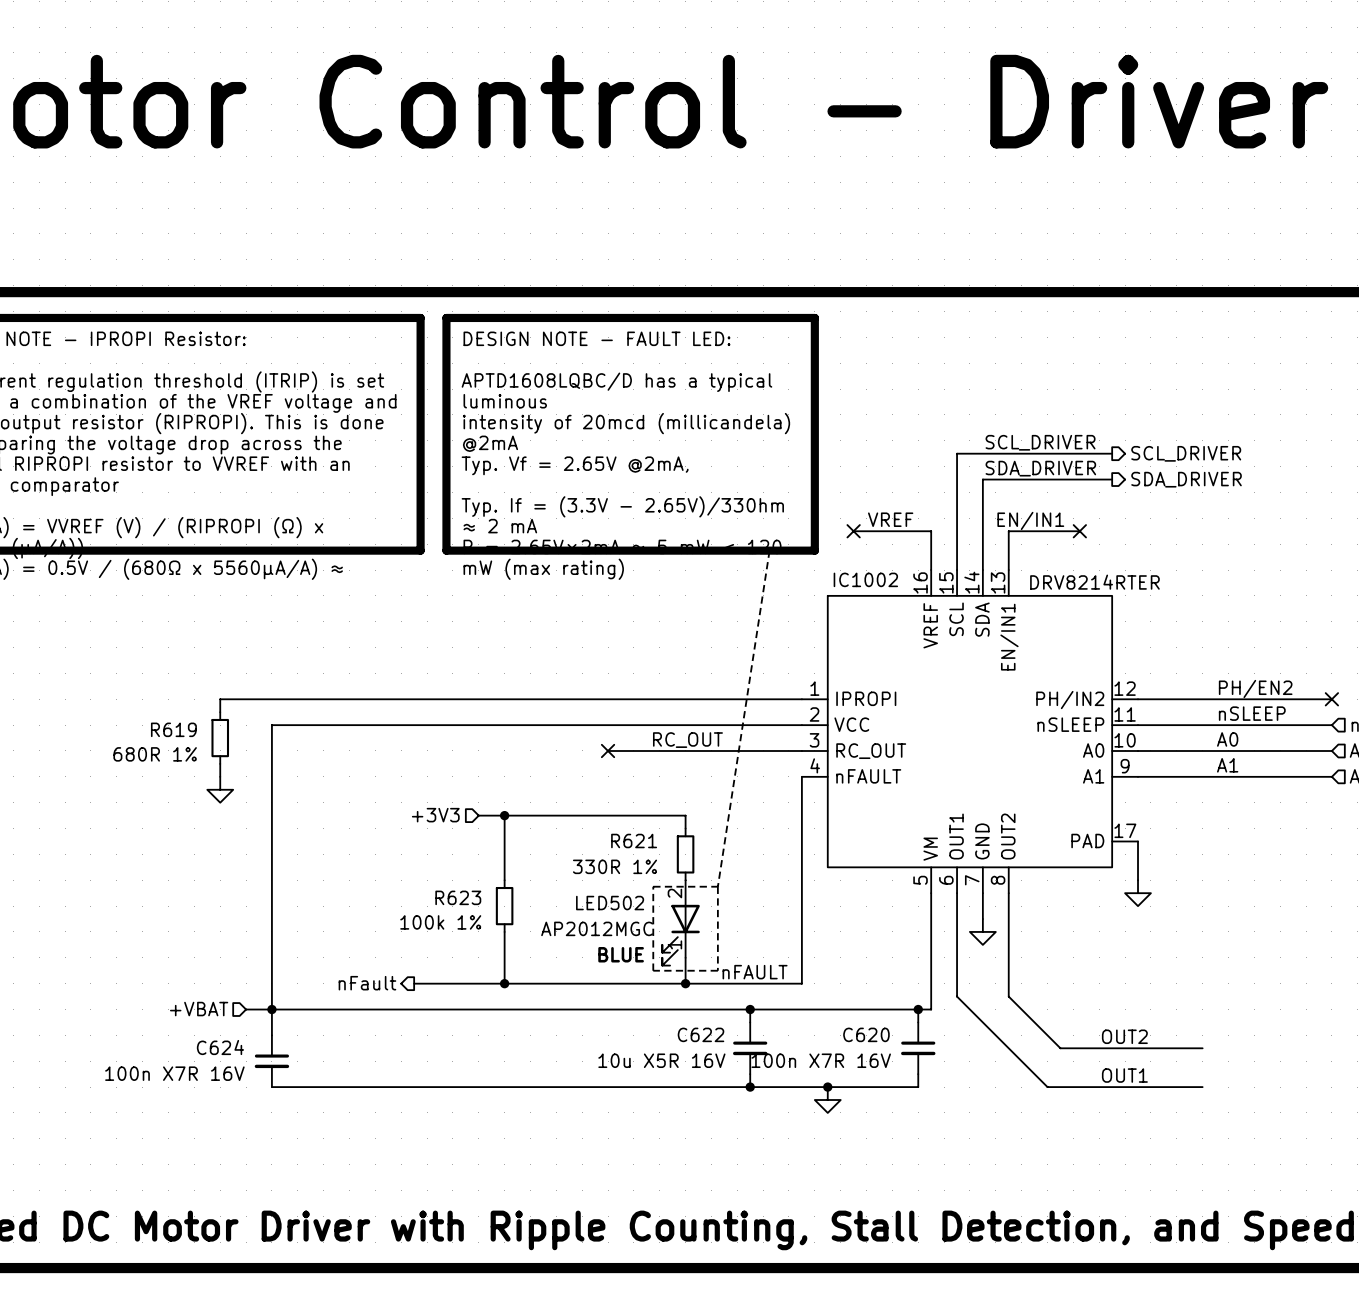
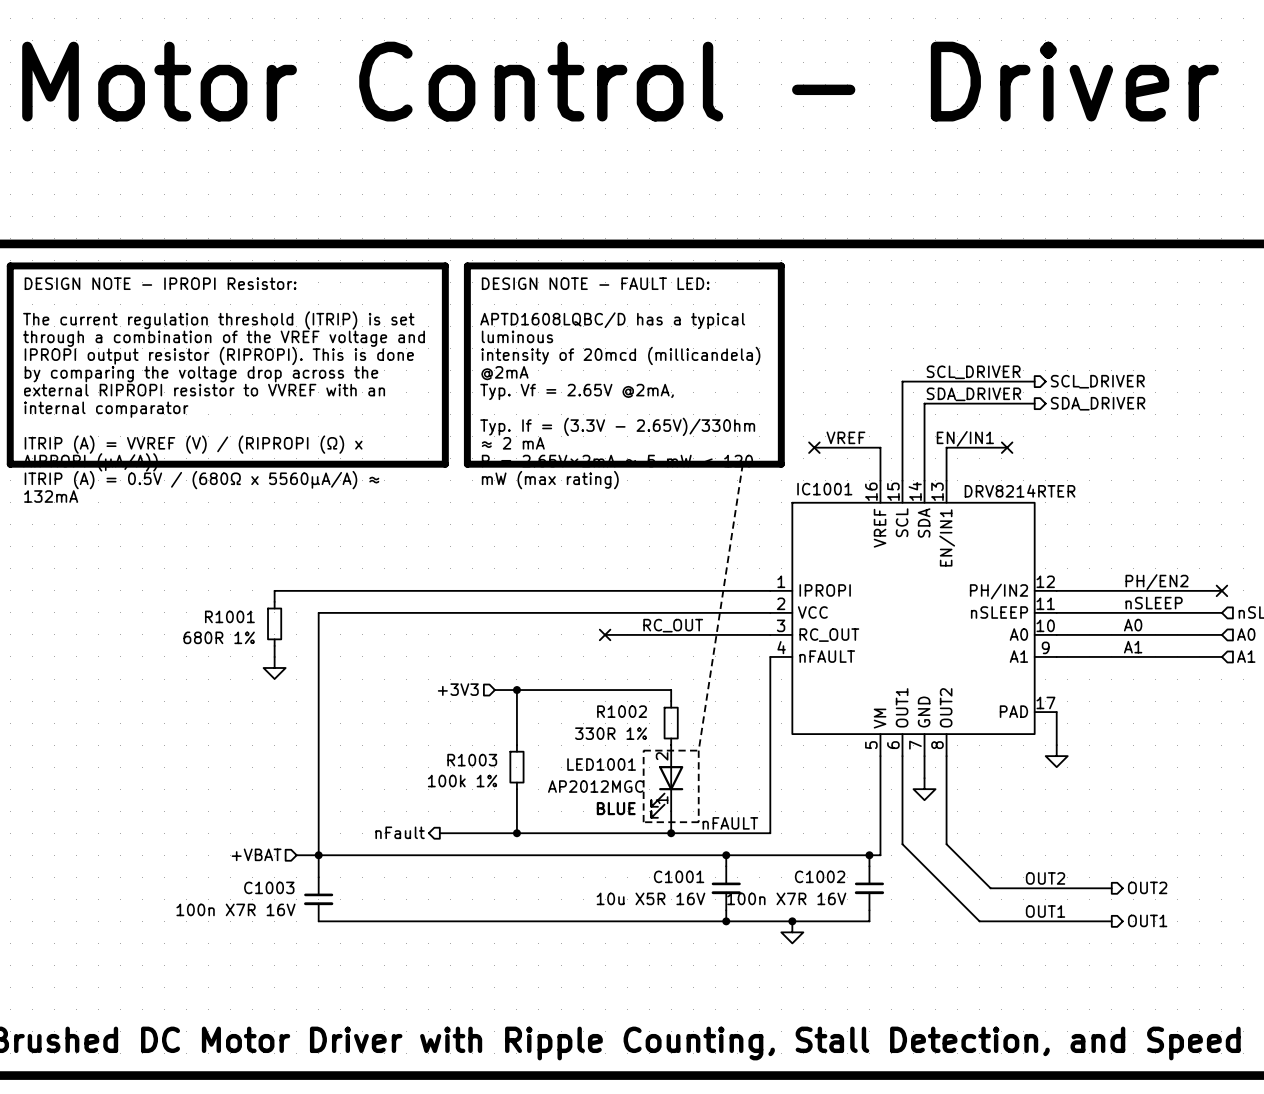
IC1002 name: IC1002 (865, 579) -> IC1001 (824, 489)
R619 name: R619 (173, 729) -> R1001 (229, 616)
R621 name: R621 (634, 840) -> R1002 (622, 711)
R623 name: R623 (458, 897) -> R1003 (472, 760)
LED502 name: LED502 (610, 903) -> LED1001 (601, 764)
C622 name: C622 (701, 1034) -> C1001 (679, 876)
C620 name: C620 (866, 1034) -> C1002 (820, 876)
C624 name: C624 (220, 1047) -> C1003 (269, 887)
hierarchical label: none -> OUT2 (1147, 887)
hierarchical label: none -> OUT1 (1147, 920)

